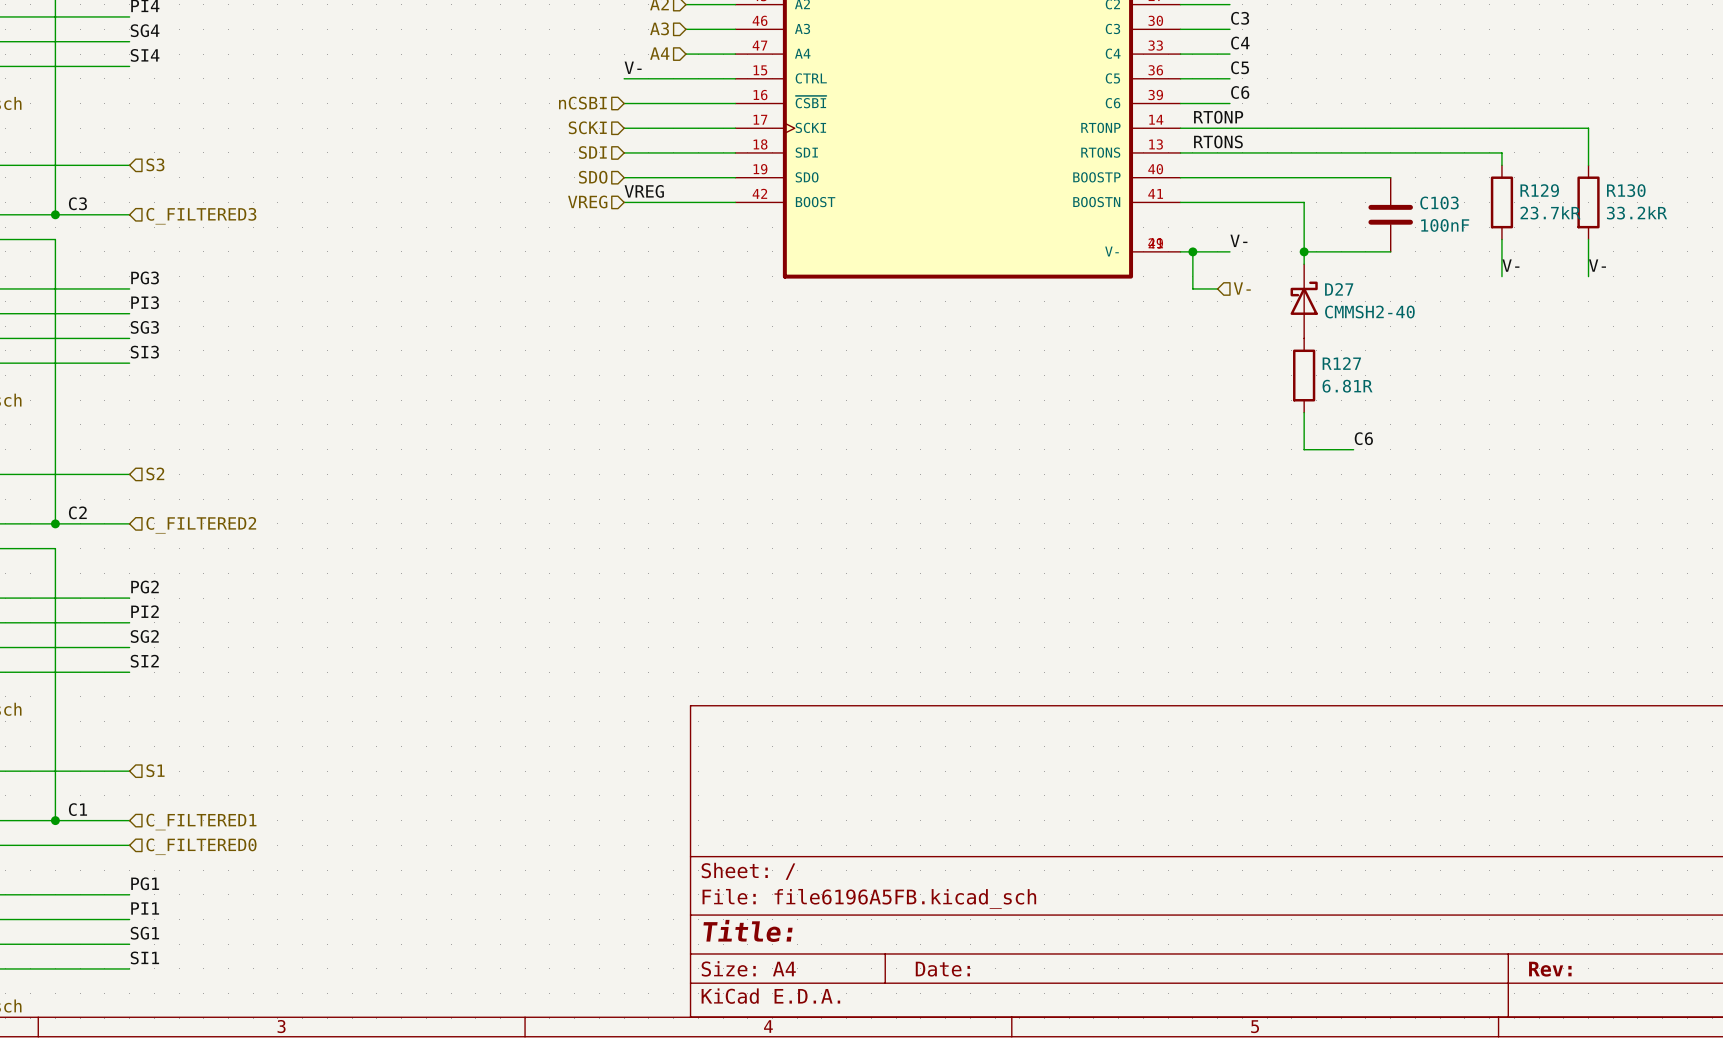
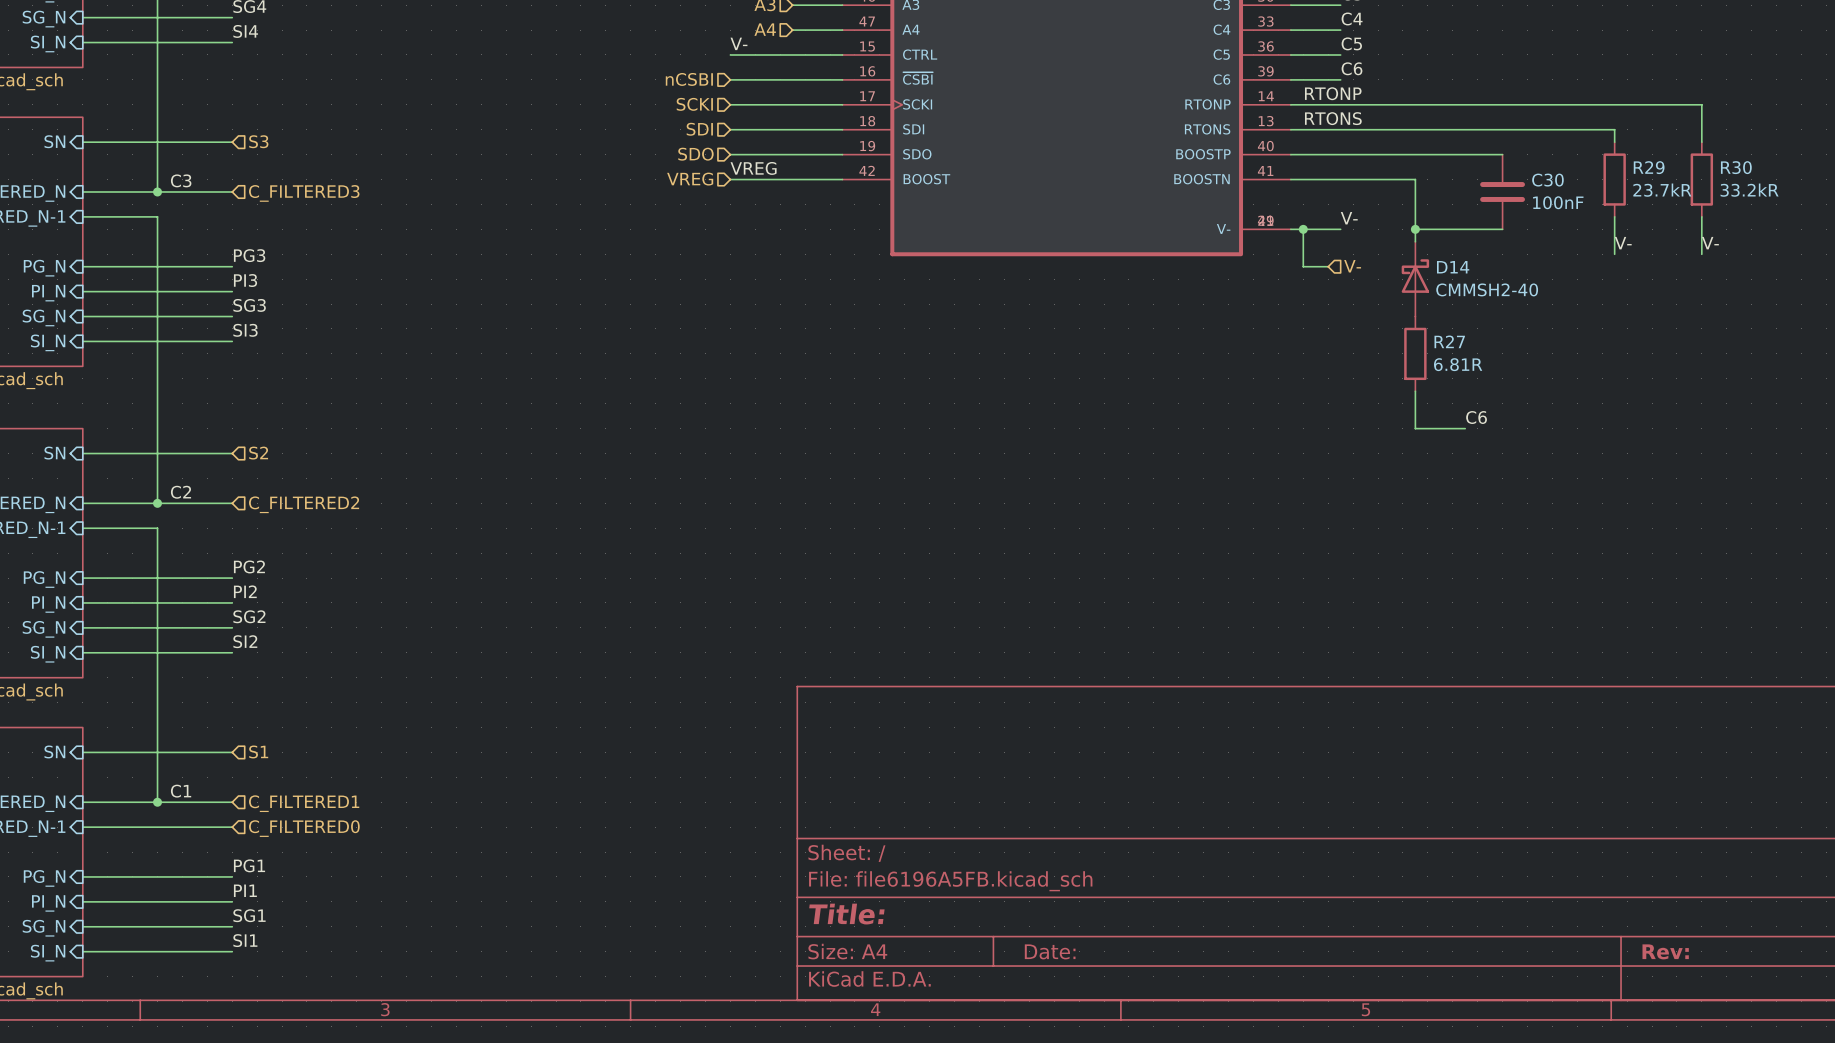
R129 name: R129 (1539, 190) -> R29 (1649, 167)
R130 name: R130 (1626, 190) -> R30 (1736, 167)
C103 name: C103 (1439, 202) -> C30 (1547, 180)
D27 name: D27 (1339, 289) -> D14 (1453, 267)
R127 name: R127 (1341, 363) -> R27 (1449, 341)

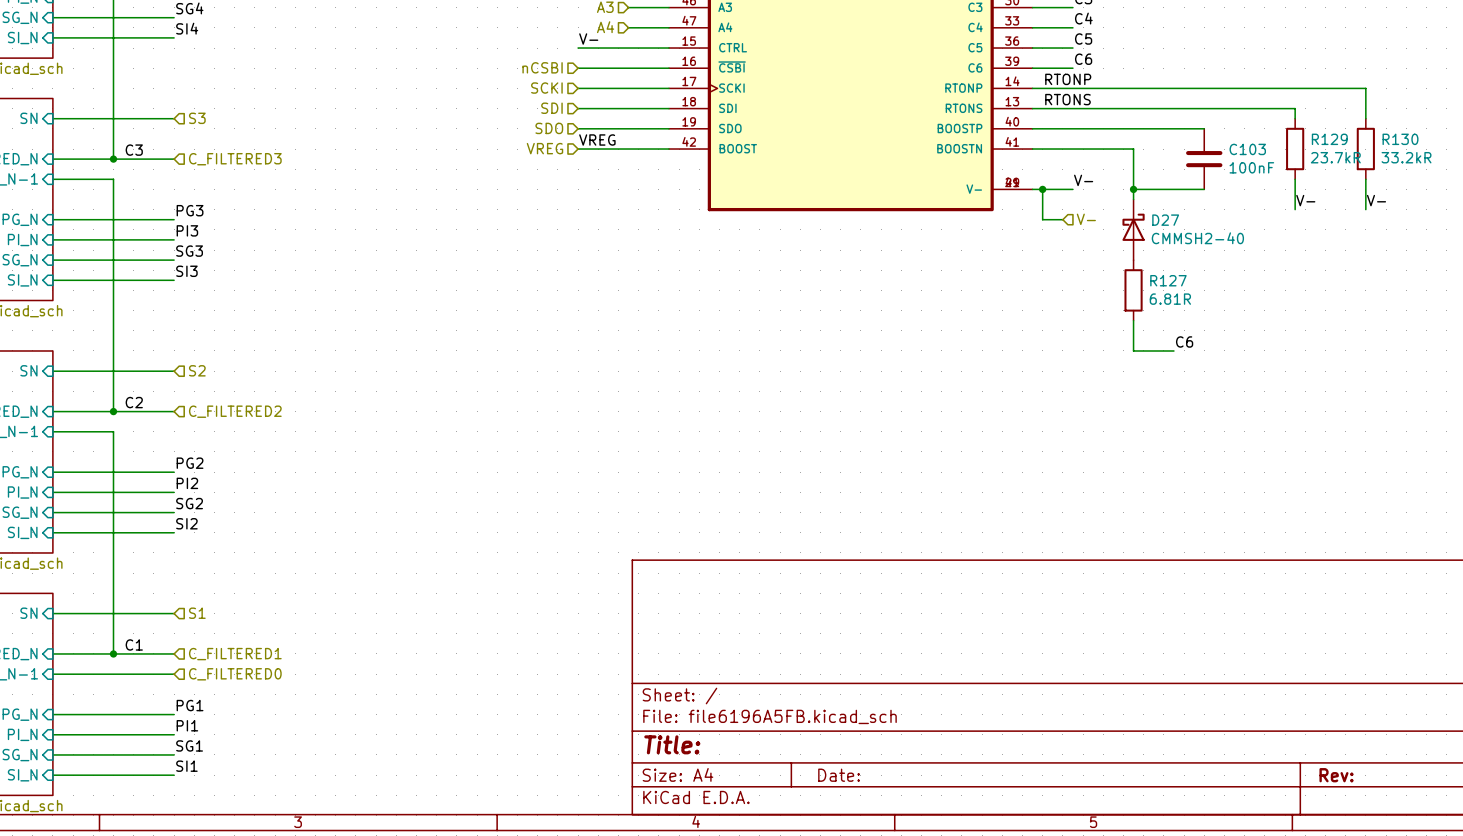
R29 name: R29 (1649, 167) -> R129 (1329, 139)
R30 name: R30 (1736, 167) -> R130 (1400, 139)
C30 name: C30 (1547, 180) -> C103 (1247, 149)
D14 name: D14 (1453, 267) -> D27 (1165, 220)
R27 name: R27 (1449, 341) -> R127 (1168, 280)

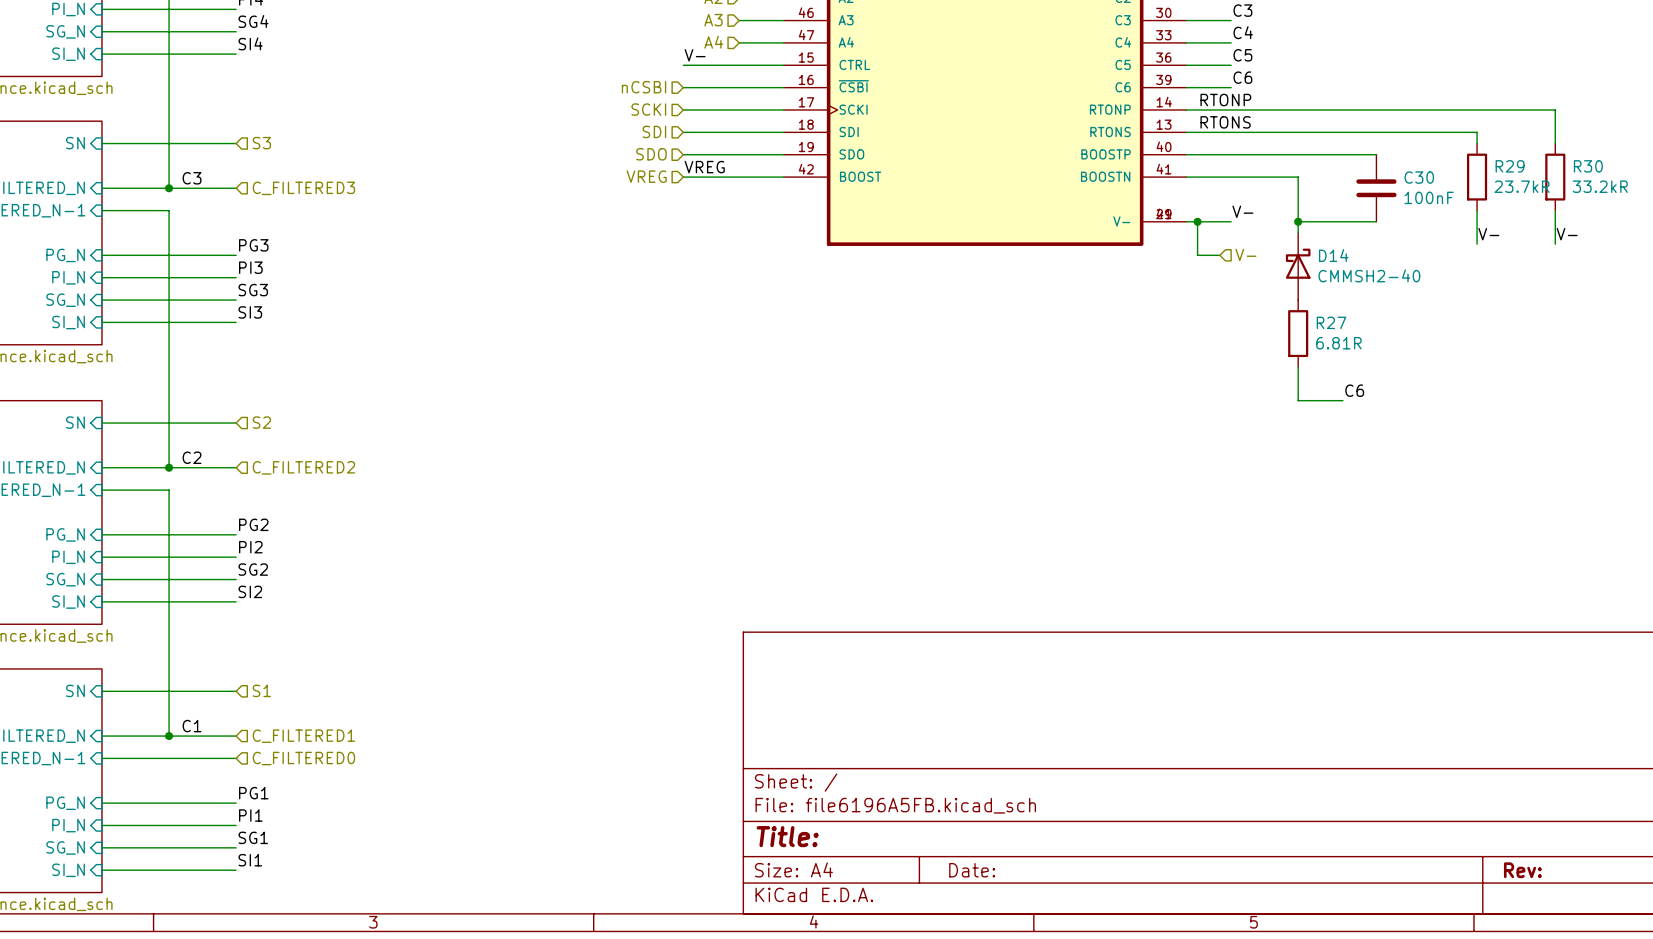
R129 name: R129 (1329, 139) -> R29 (1510, 166)
R130 name: R130 (1400, 139) -> R30 (1588, 166)
C103 name: C103 (1247, 149) -> C30 (1419, 177)
D27 name: D27 (1165, 220) -> D14 (1333, 255)
R127 name: R127 (1168, 280) -> R27 (1331, 322)

